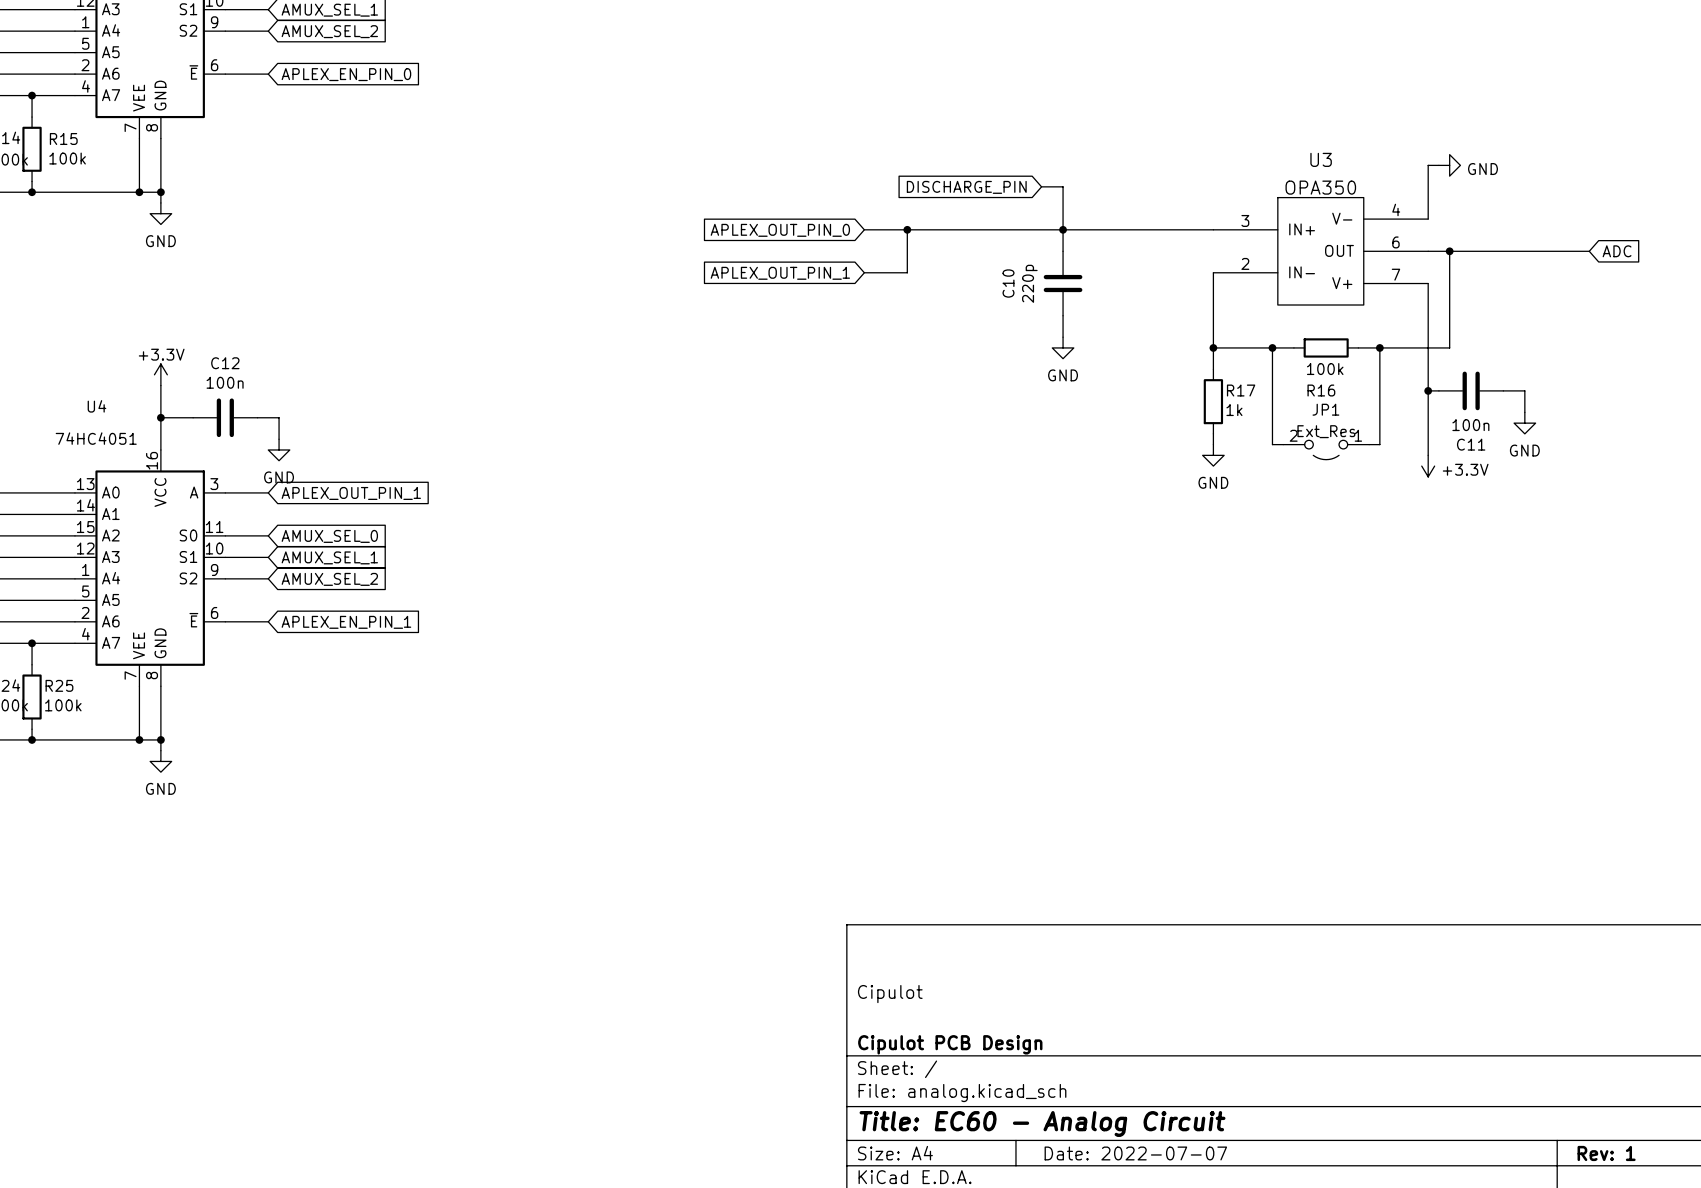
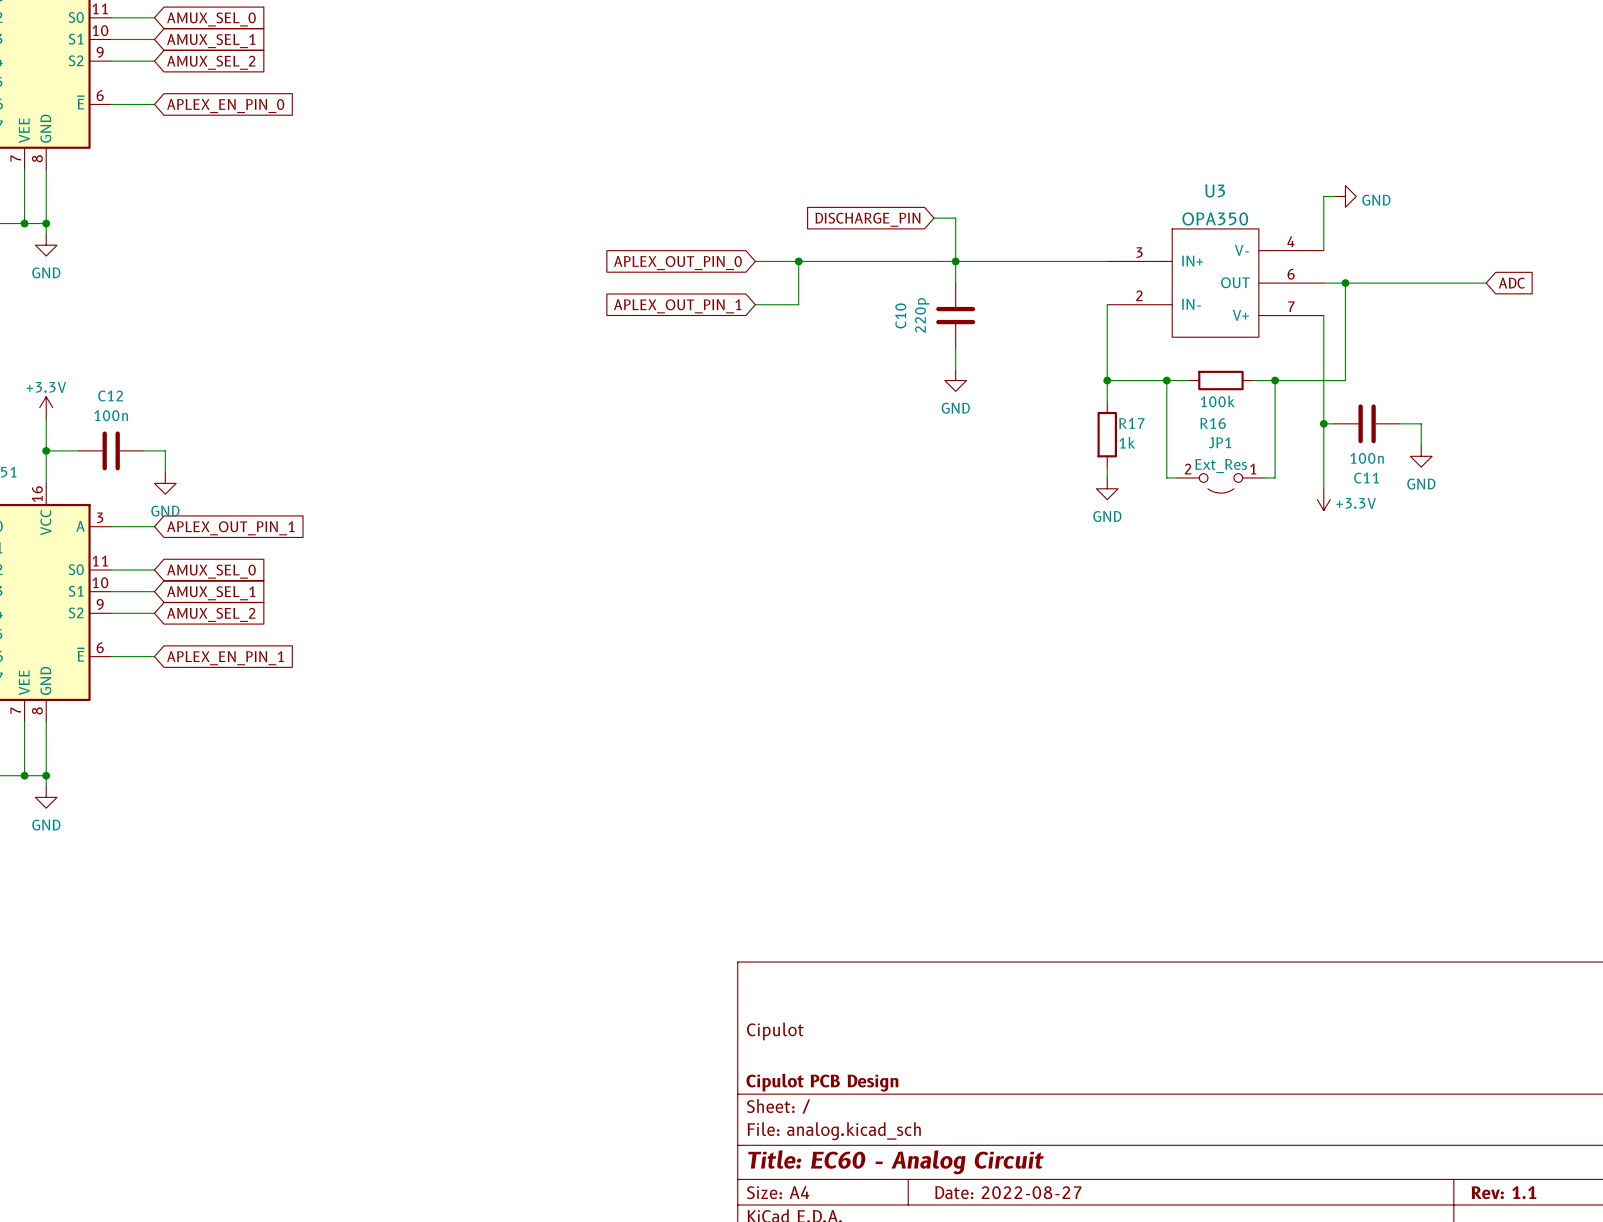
title block: Date: 2022-07-07 (1135, 1153) -> Date: 2022-08-27 (1008, 1192)
title block: Rev: 1 (1606, 1153) -> Rev: 1.1 (1503, 1192)

